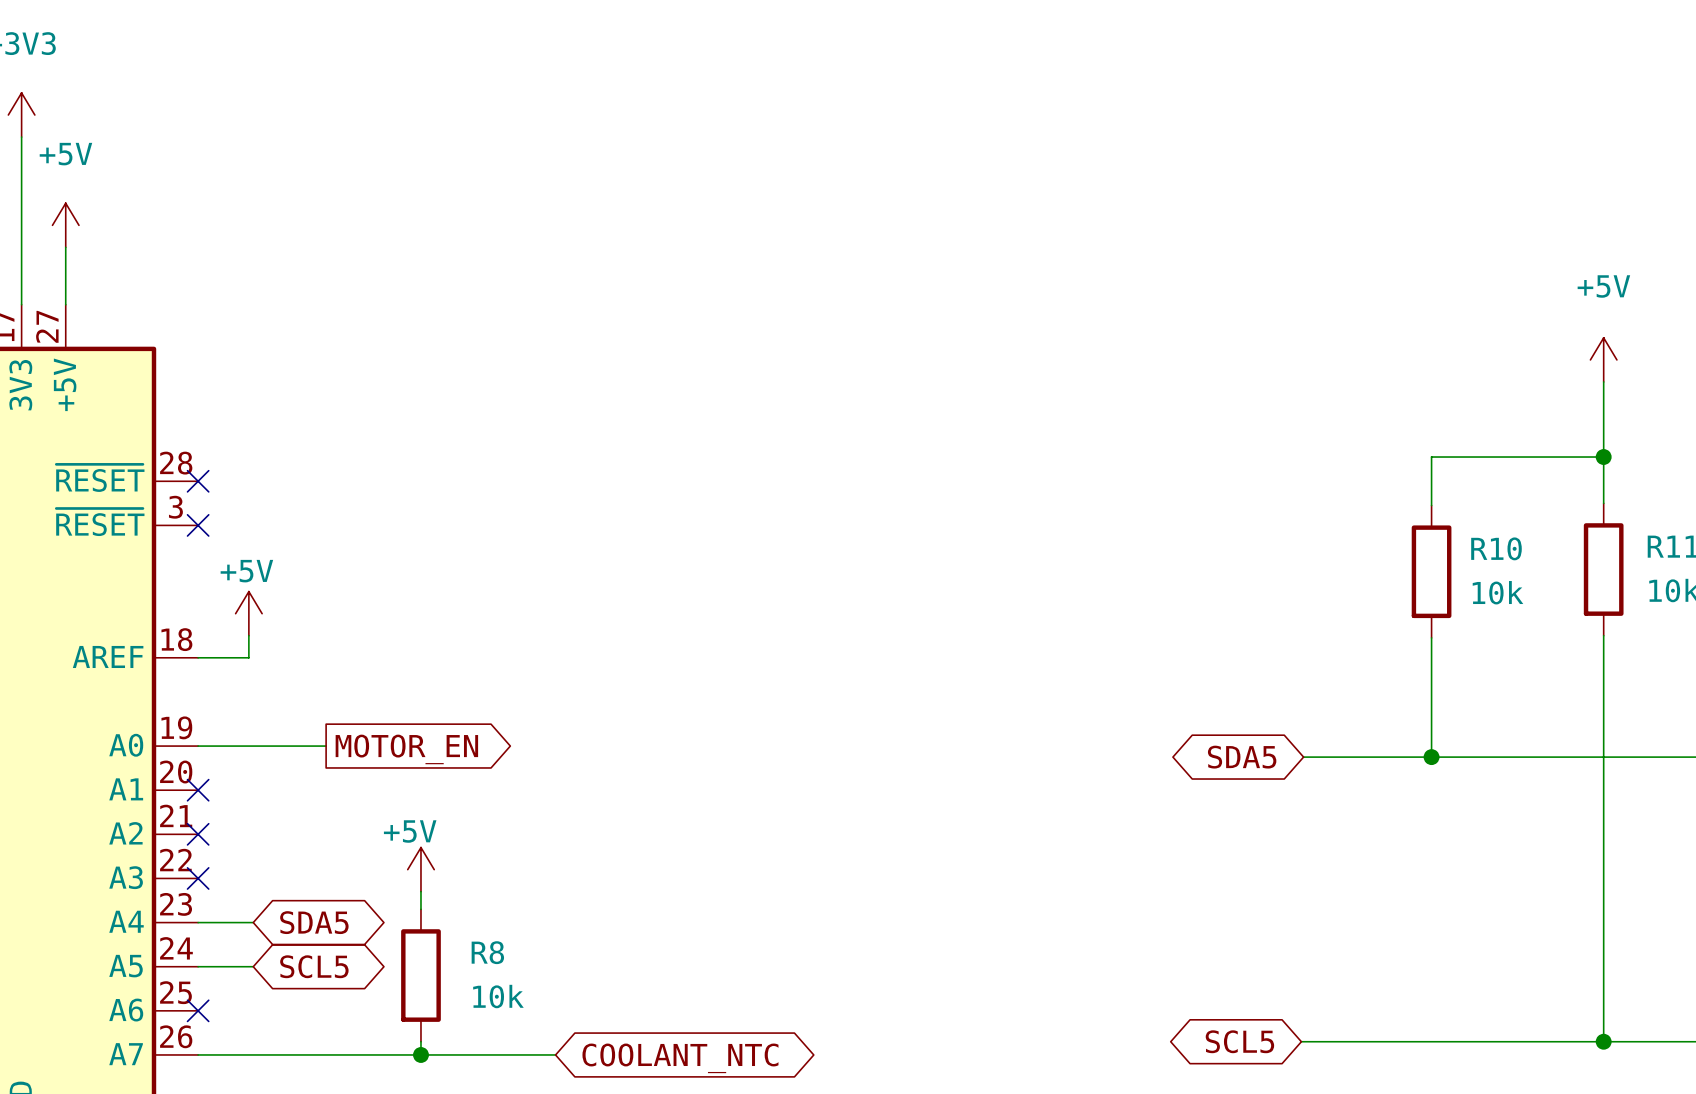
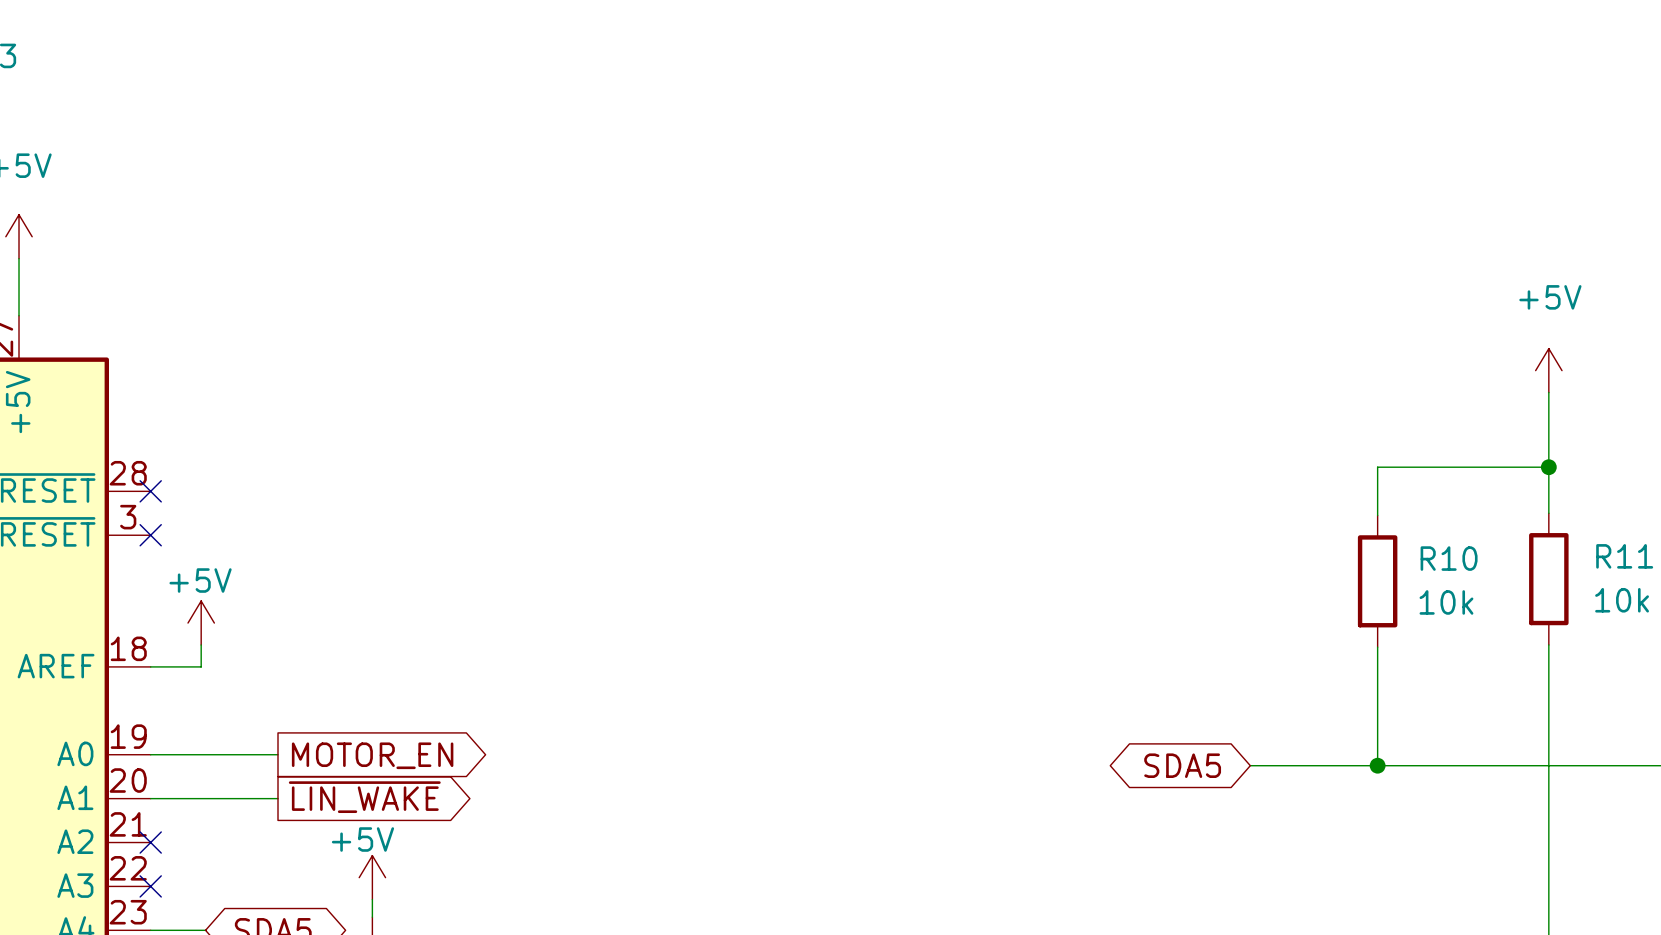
wire: none -> (150, 798) (278, 798)
no-connect mark: (198, 790) -> none
global label: none -> ~{LIN_WAKE} (364, 797)

